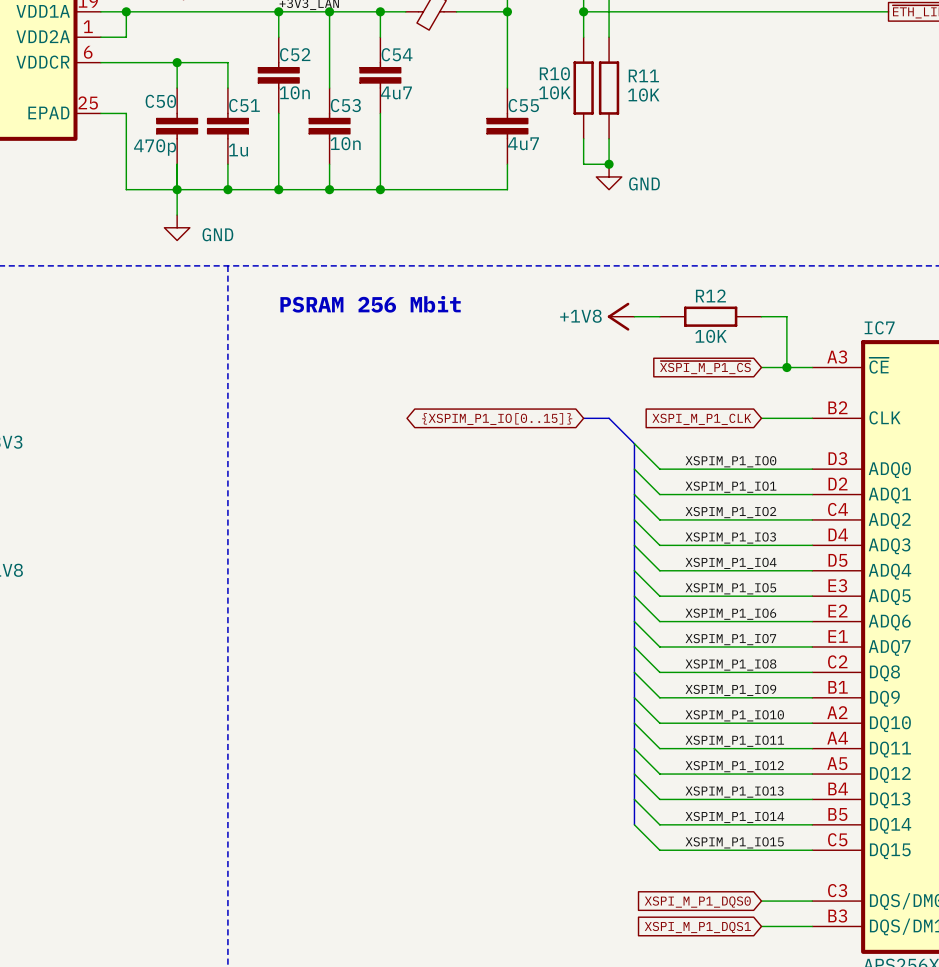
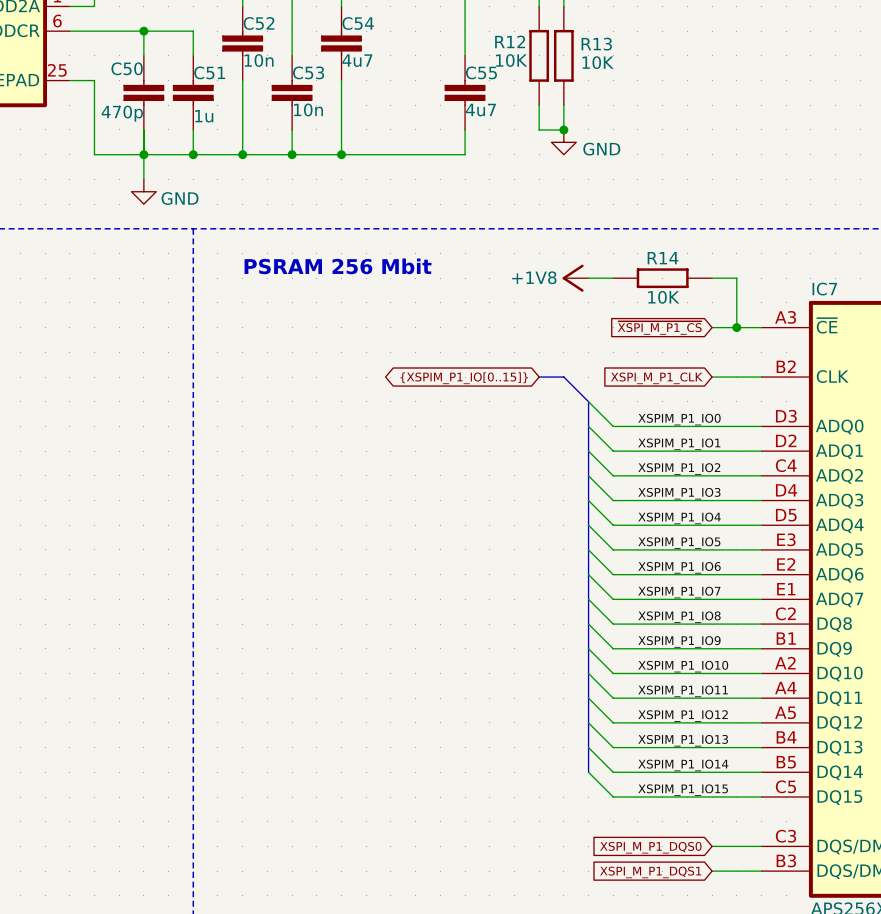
R10 name: R10 (554, 73) -> R12 (510, 41)
R11 name: R11 (643, 75) -> R13 (596, 44)
R12 name: R12 (710, 295) -> R14 (663, 258)

